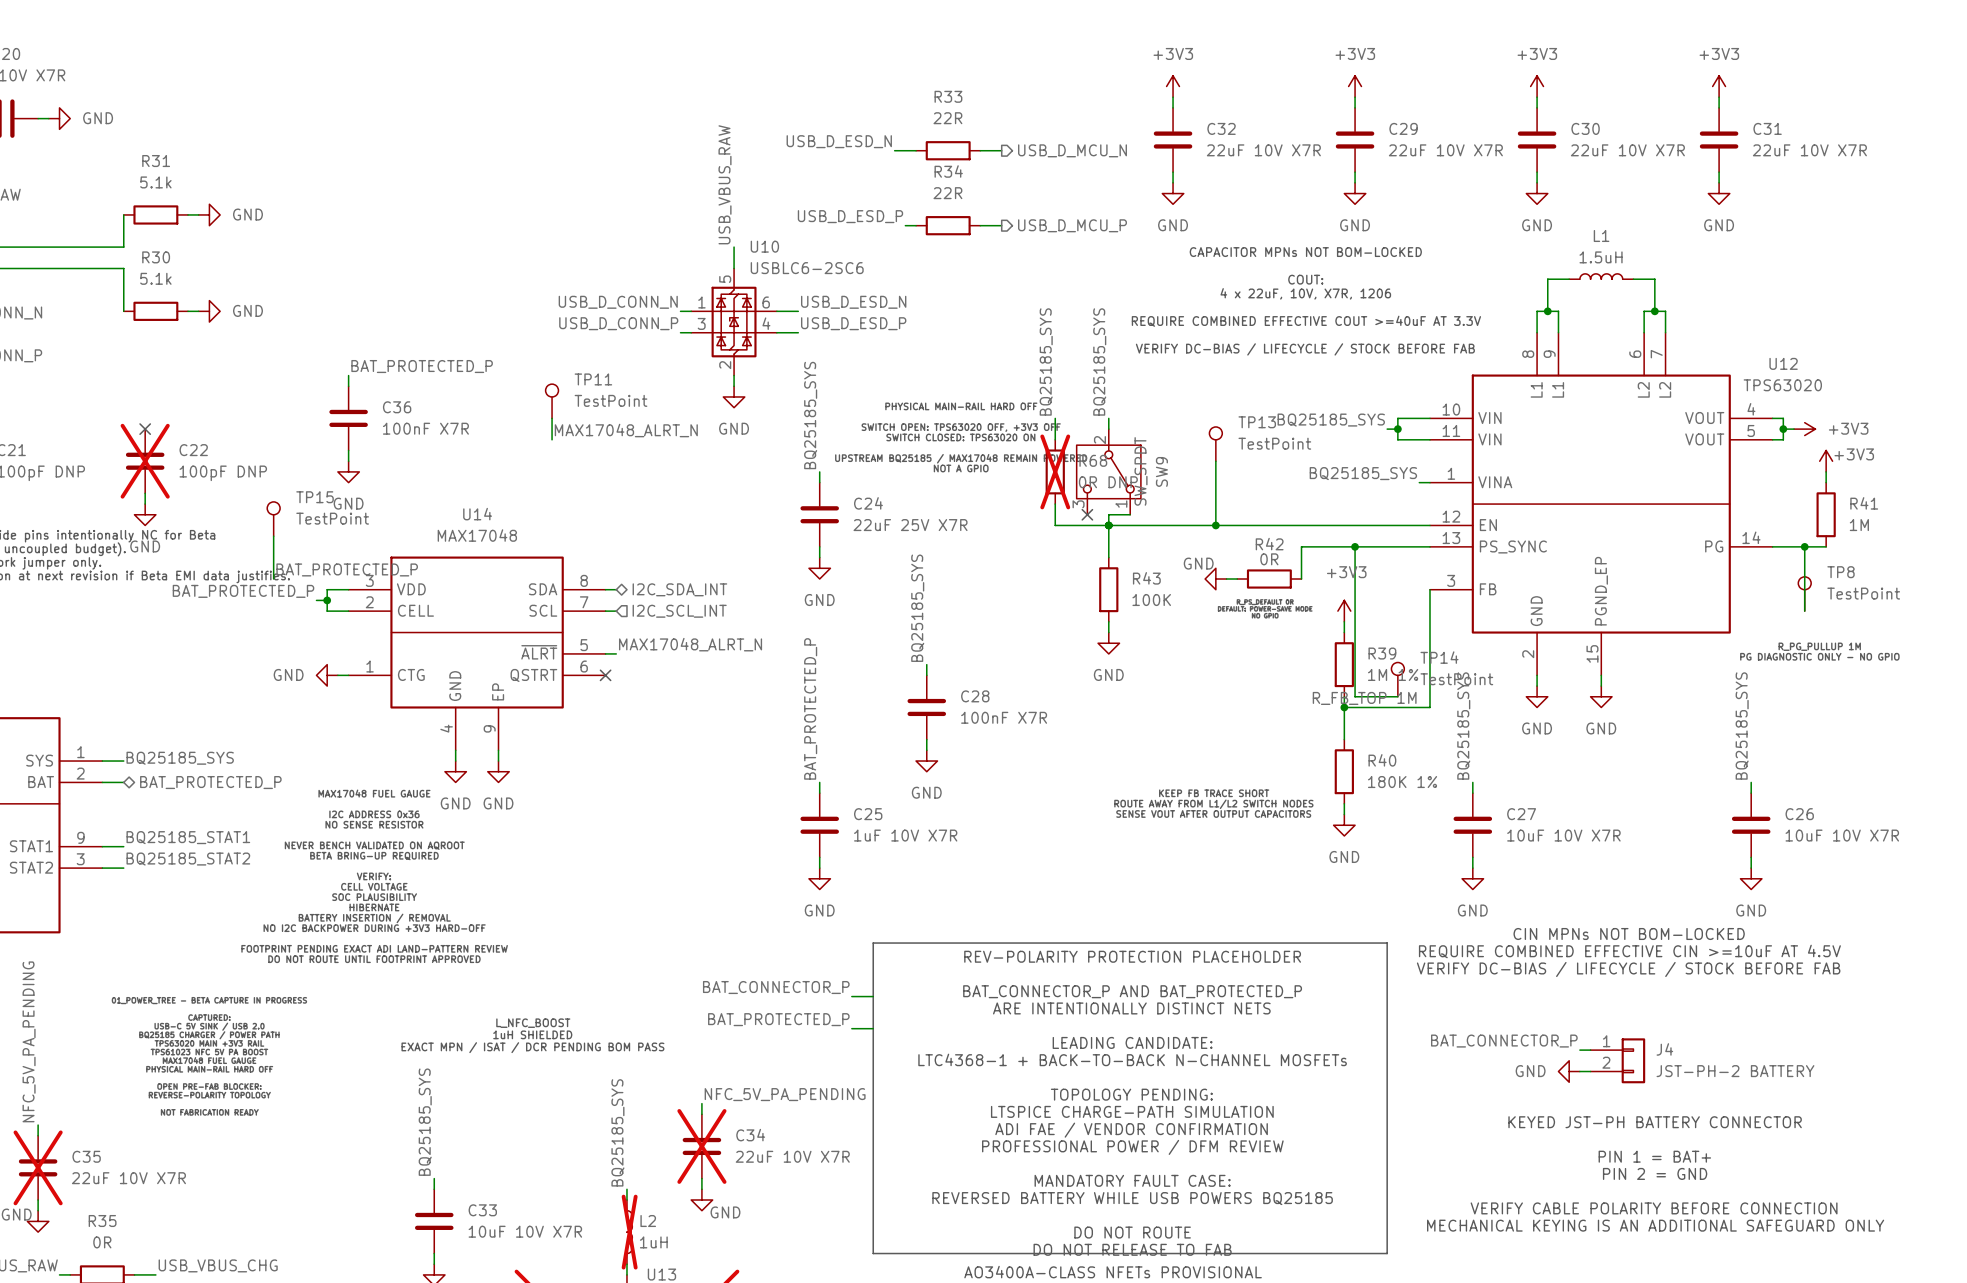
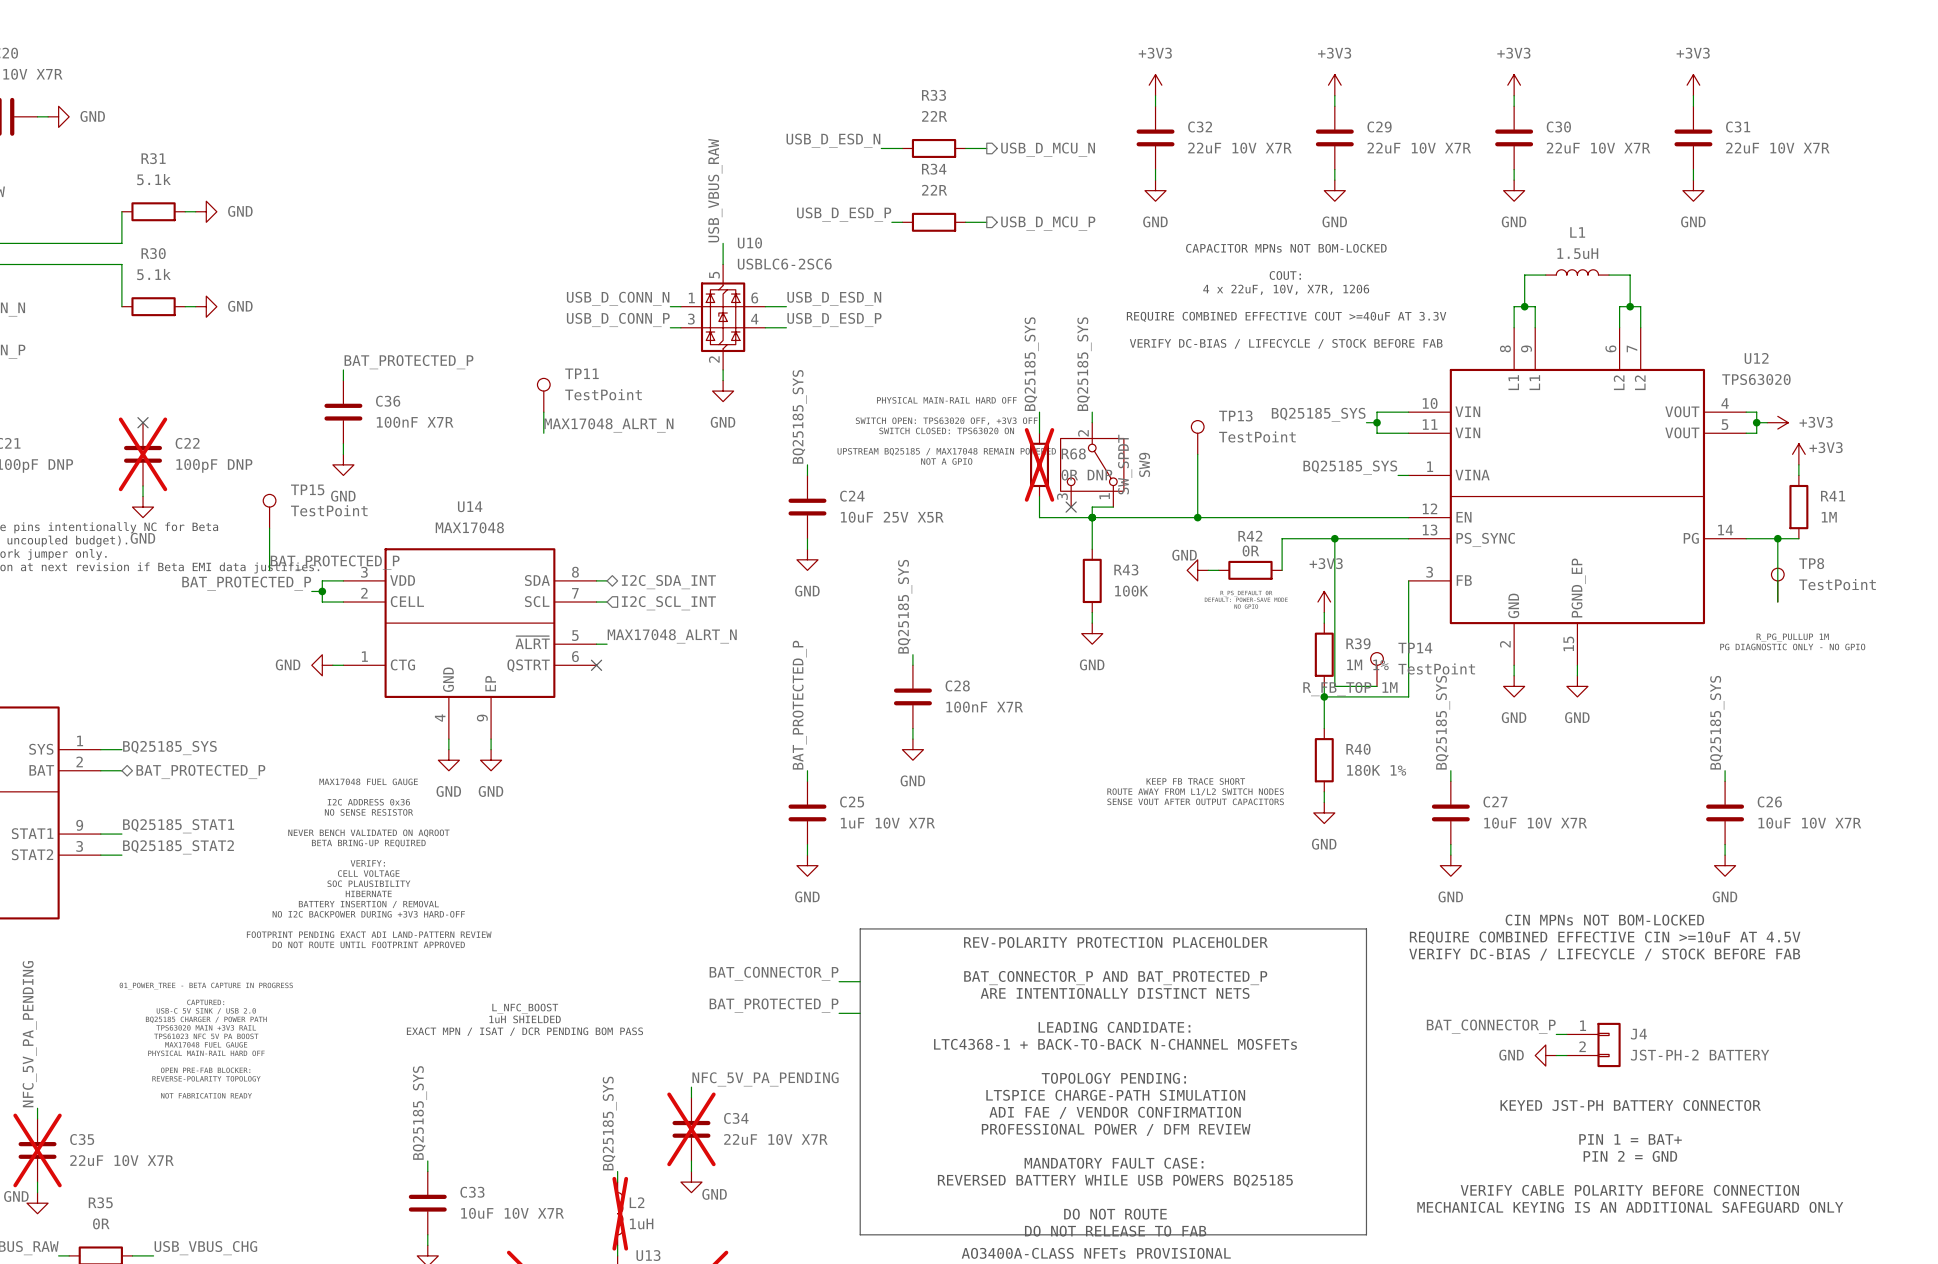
C24 value: 22uF 25V X7R (910, 525) -> 10uF 25V X5R (892, 517)

